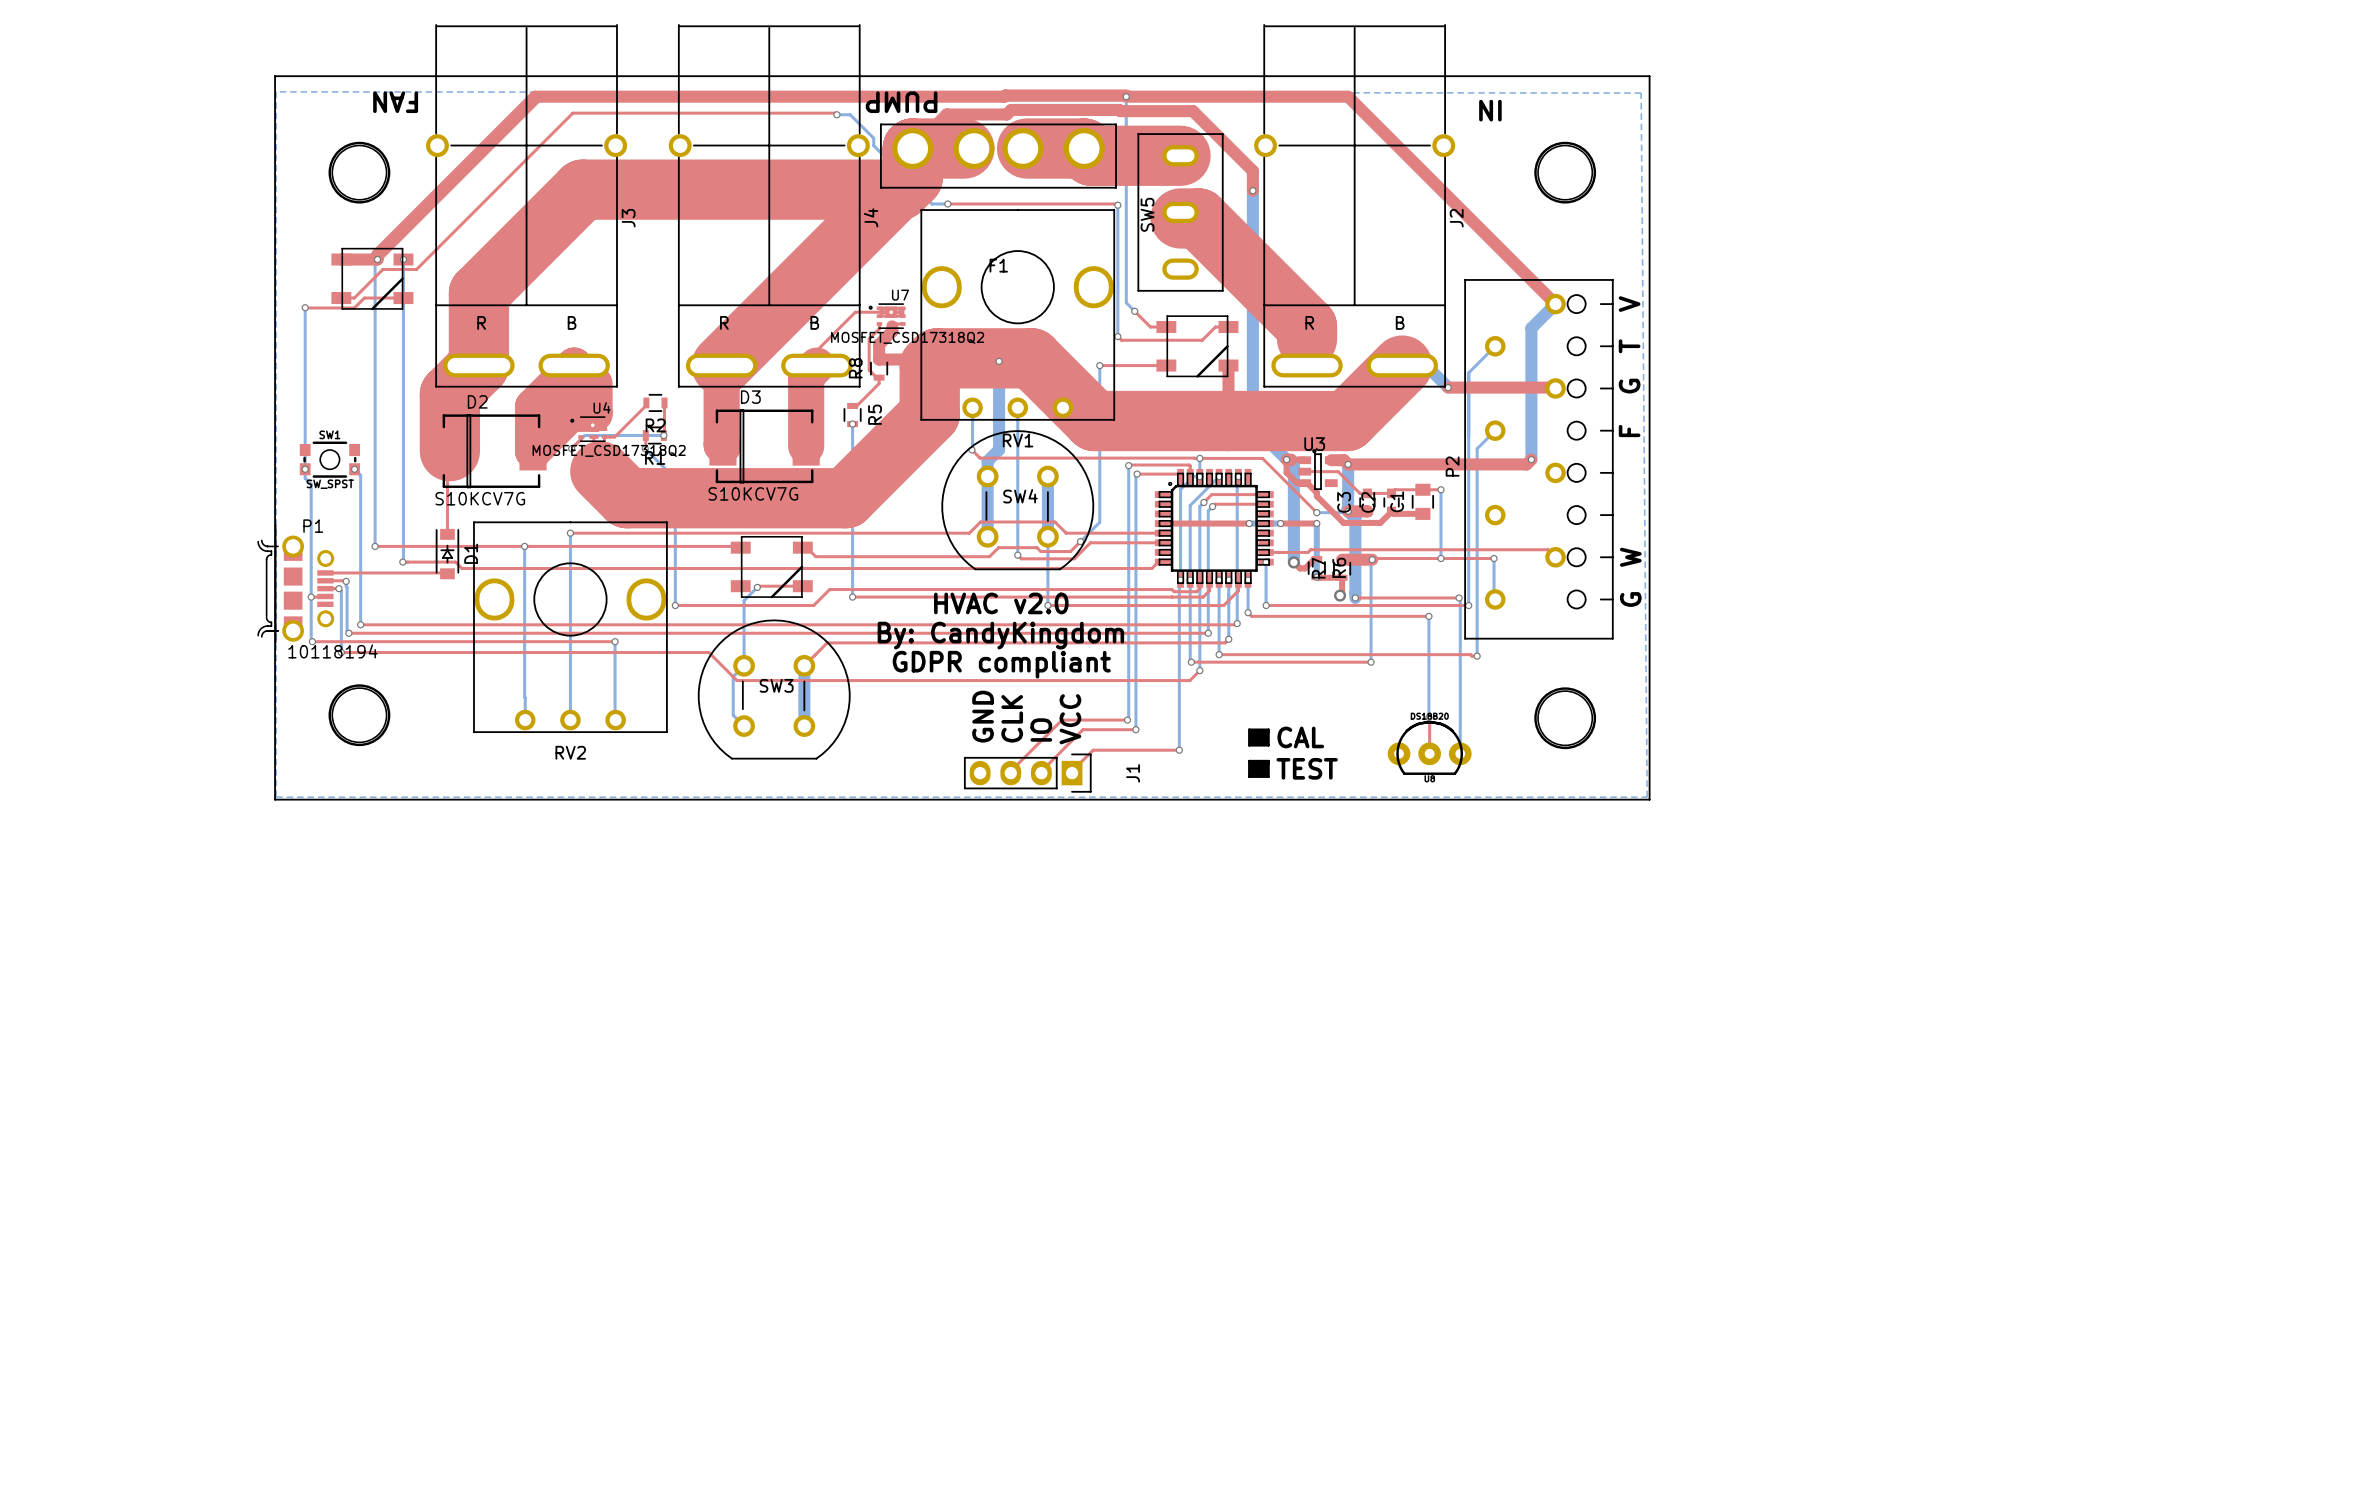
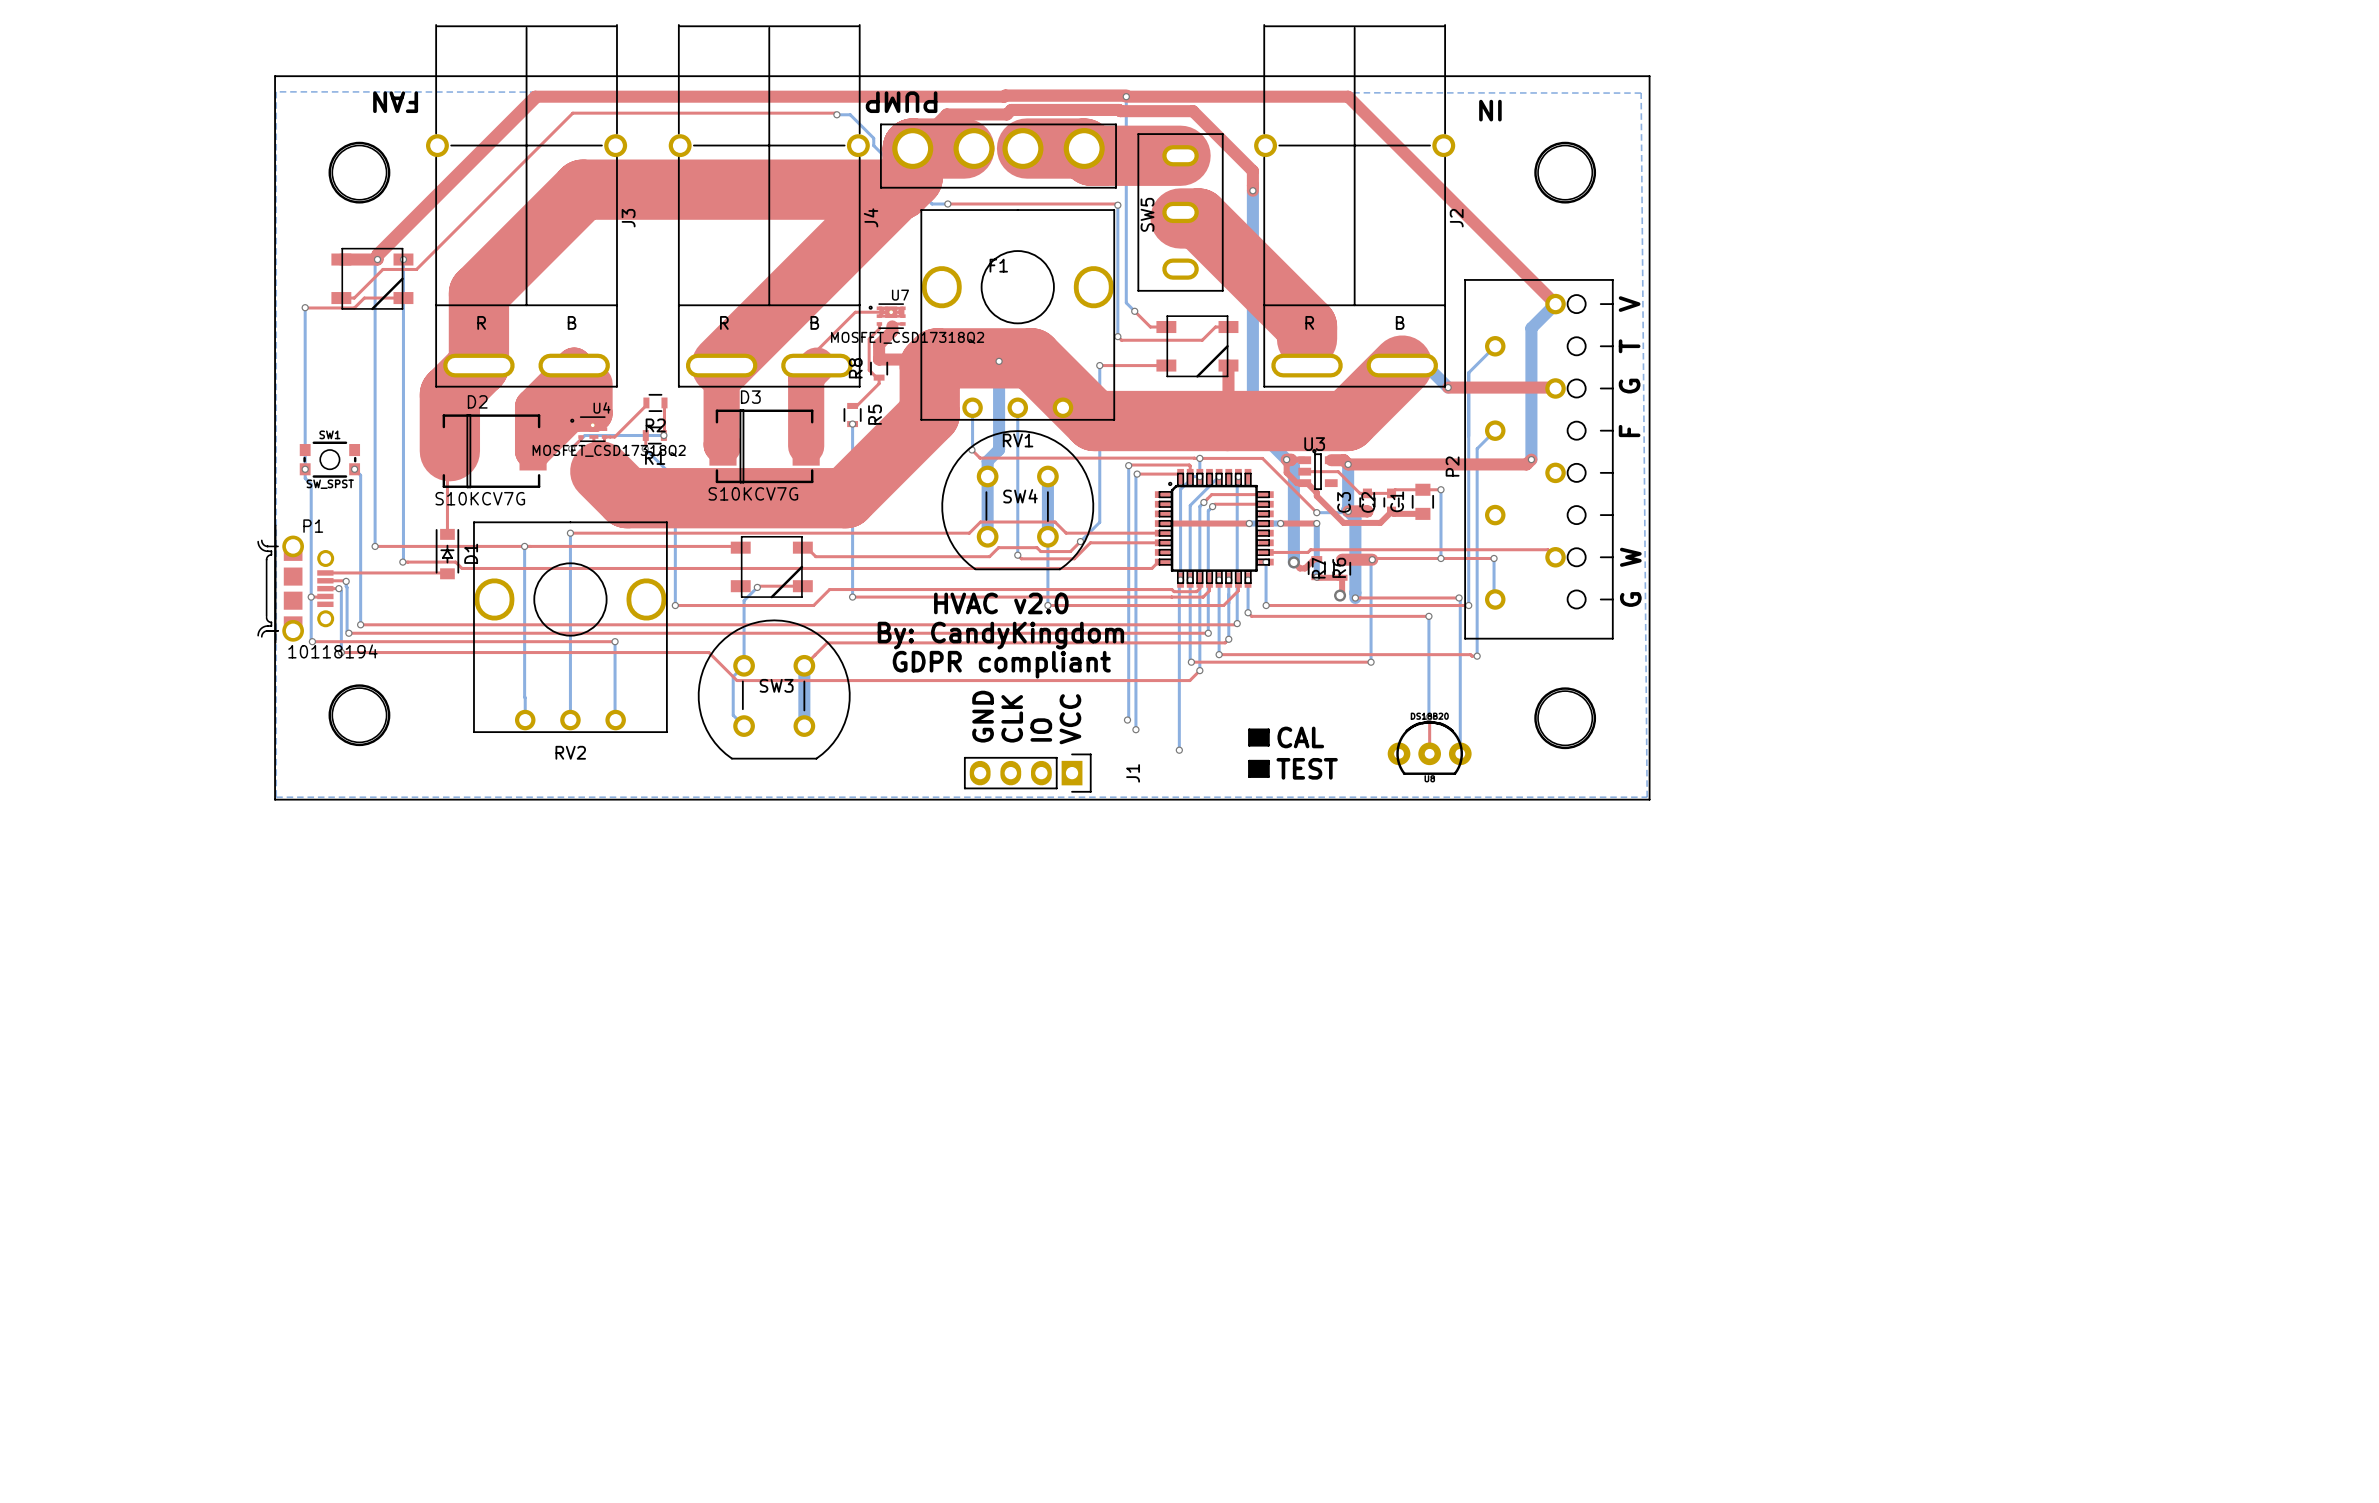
top track: (1127, 720) (1061, 720) (1010, 773) -> none
top track: (1135, 729) (1082, 729) (1041, 773) -> none
top track: (1179, 750) (1093, 750) (1072, 773) -> none

